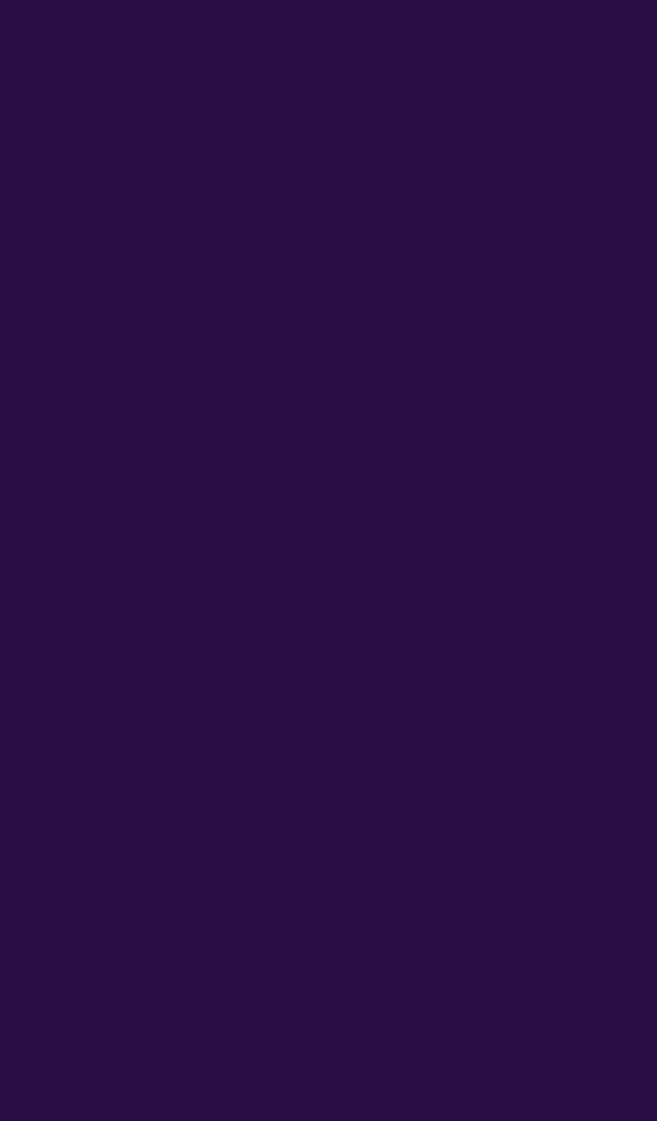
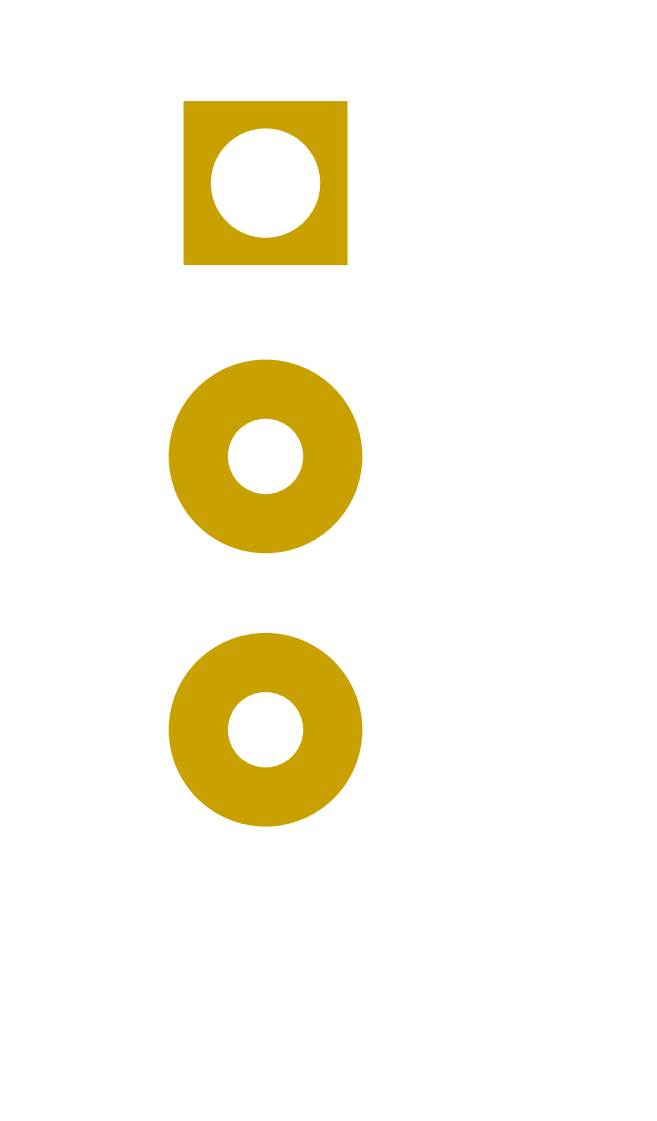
part: none -> (265, 463)

